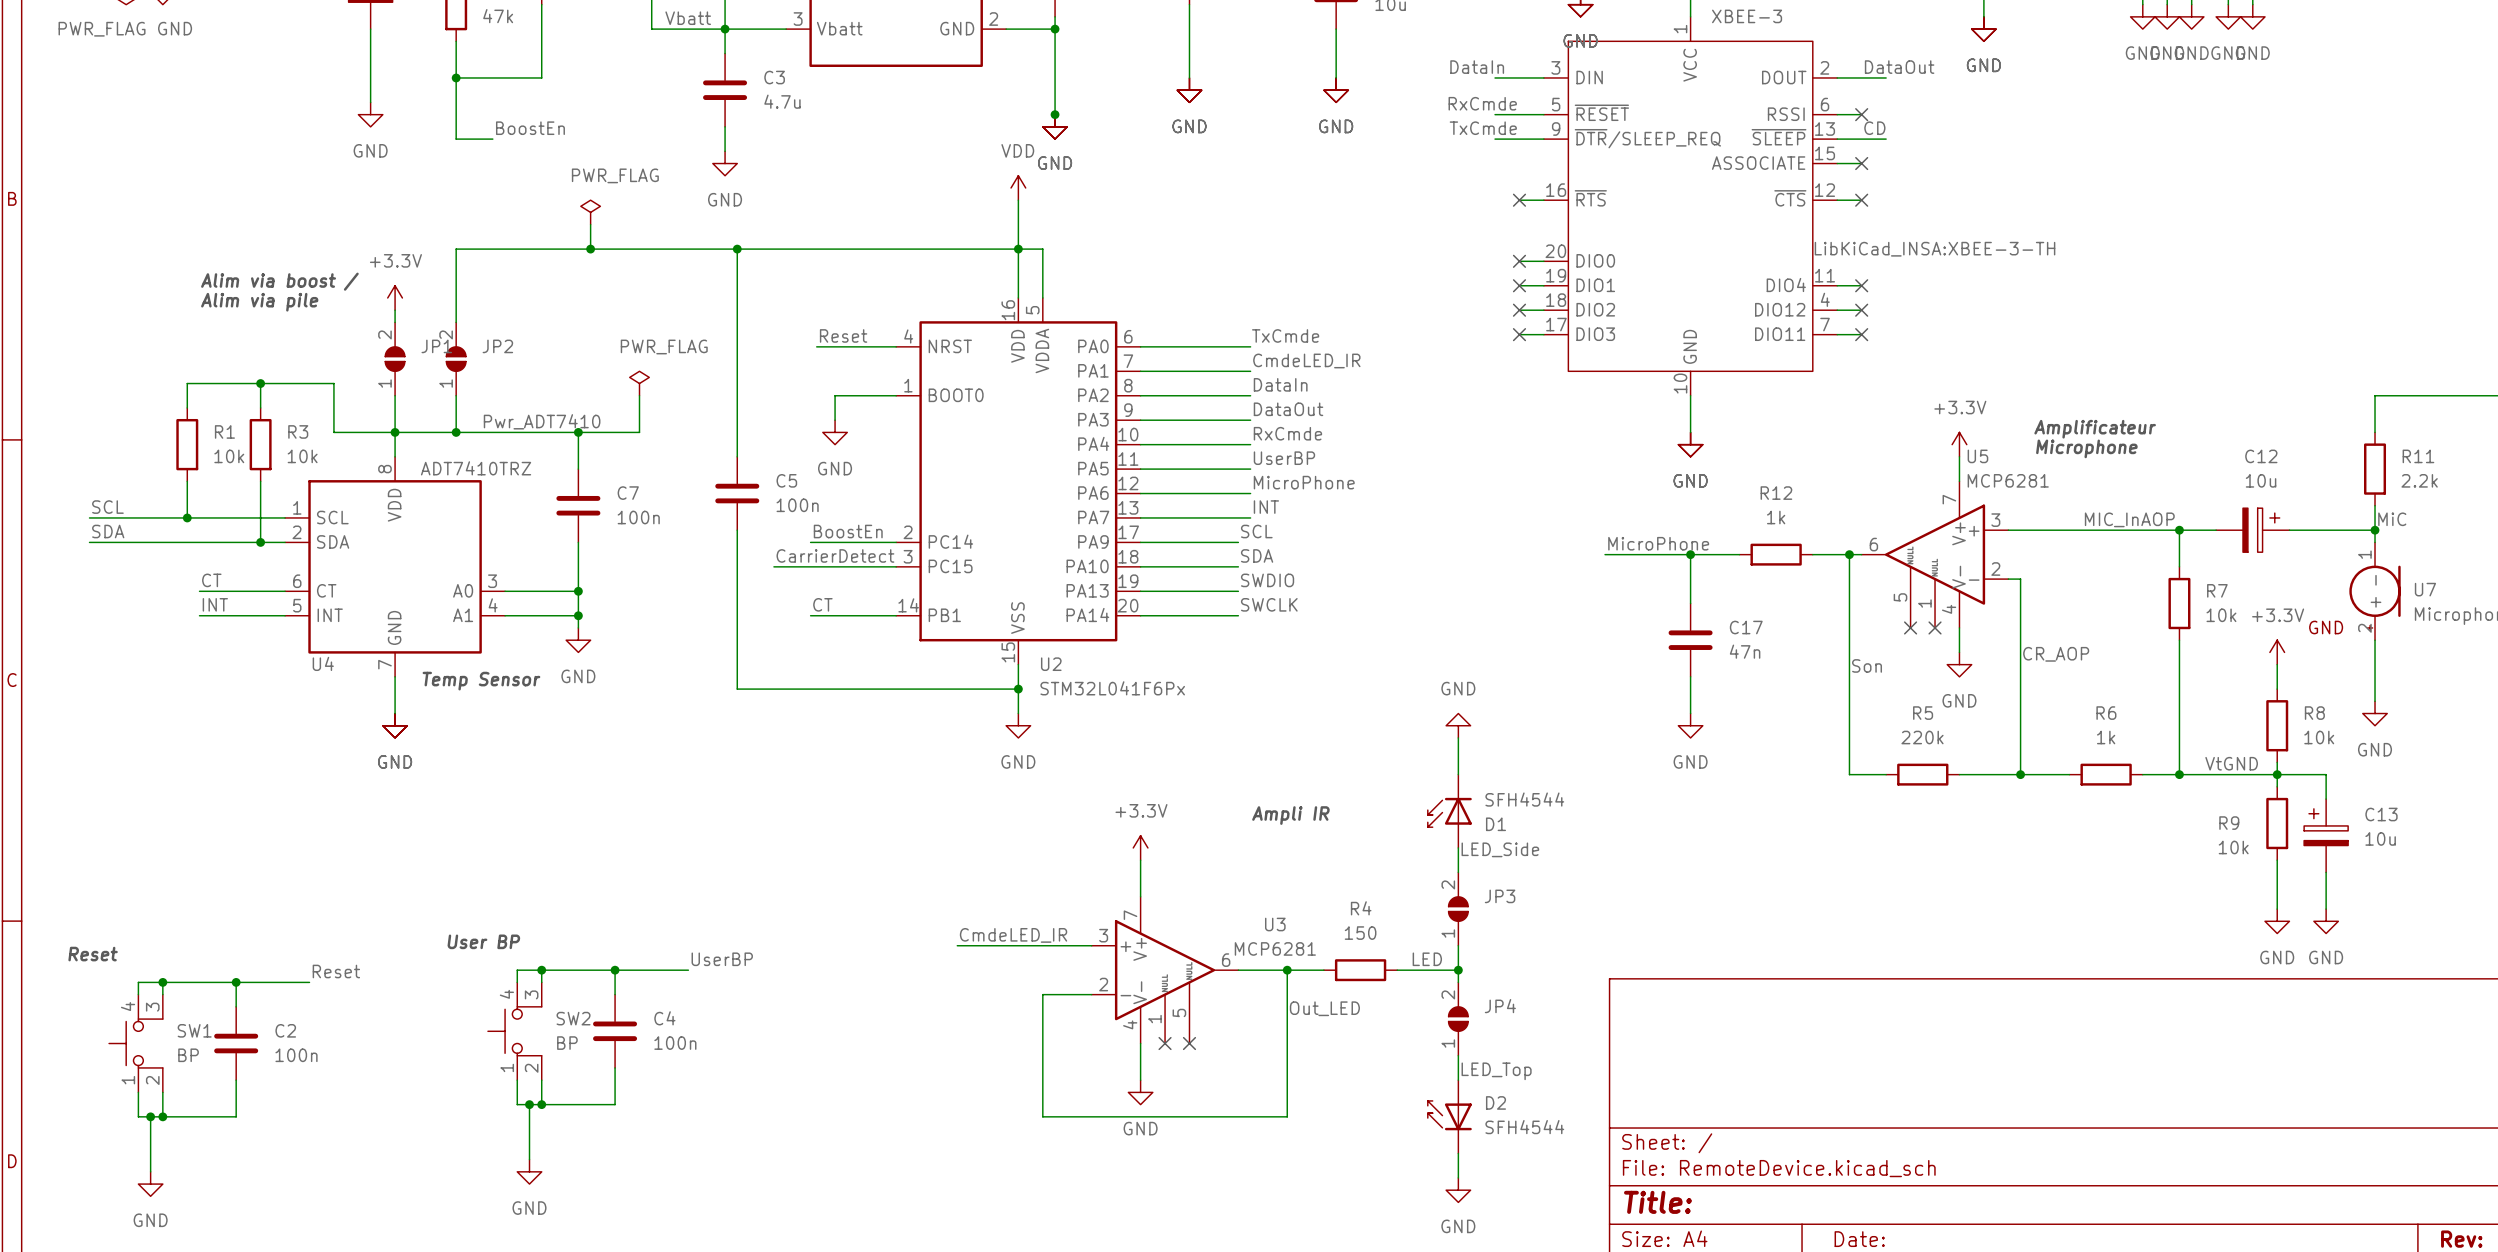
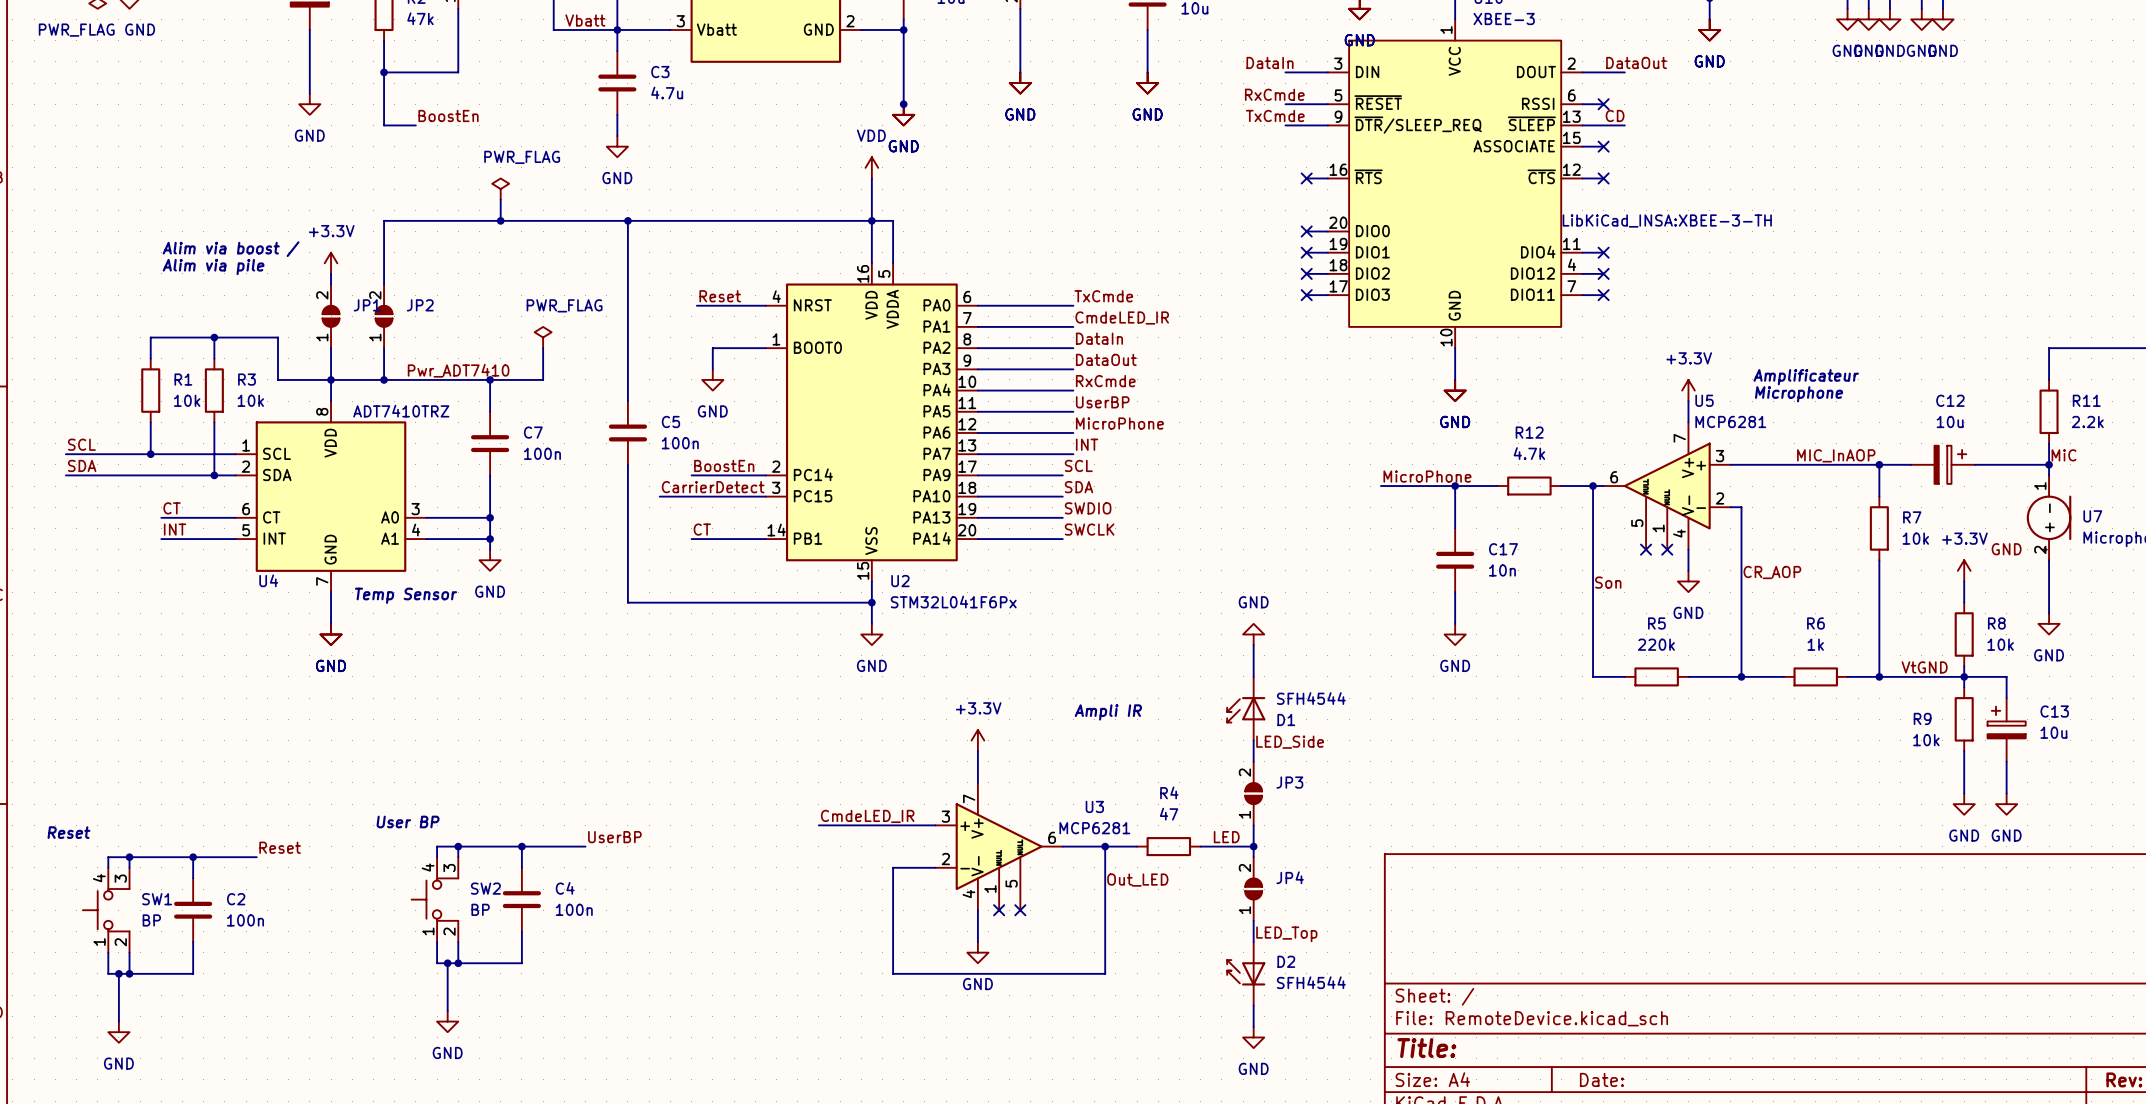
R12 value: 1k (1776, 517) -> 4.7k (1529, 453)
C17 value: 47n (1745, 651) -> 10n (1502, 570)
R4 value: 150 (1360, 933) -> 47 (1169, 814)

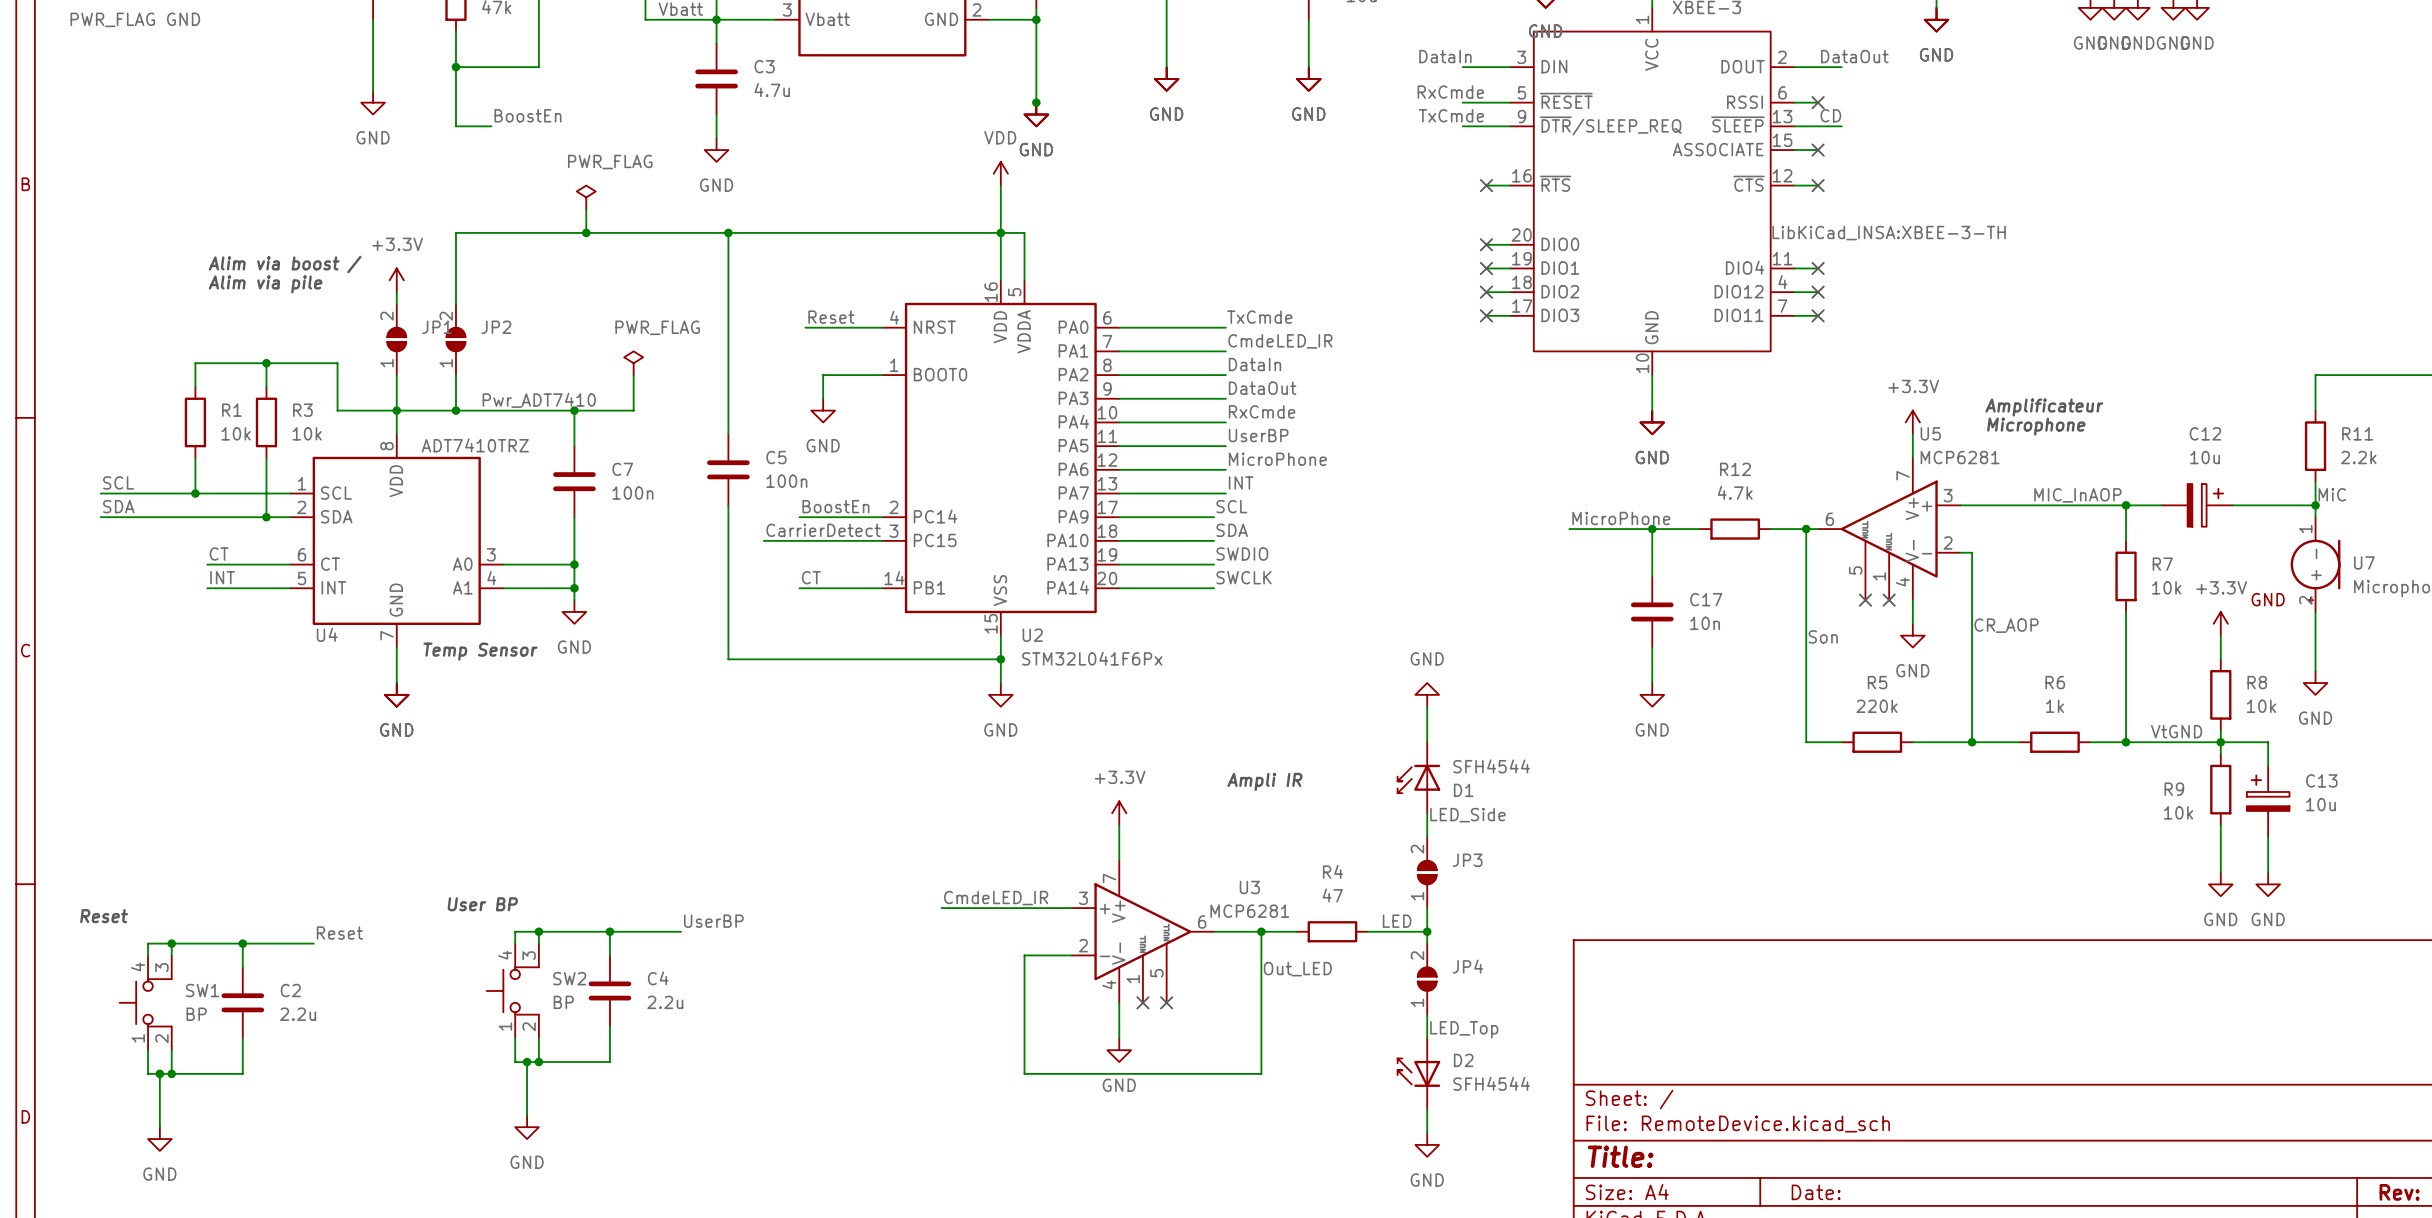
C4 value: 100n (574, 909) -> 2.2u (665, 1002)
C2 value: 100n (245, 920) -> 2.2u (298, 1014)

